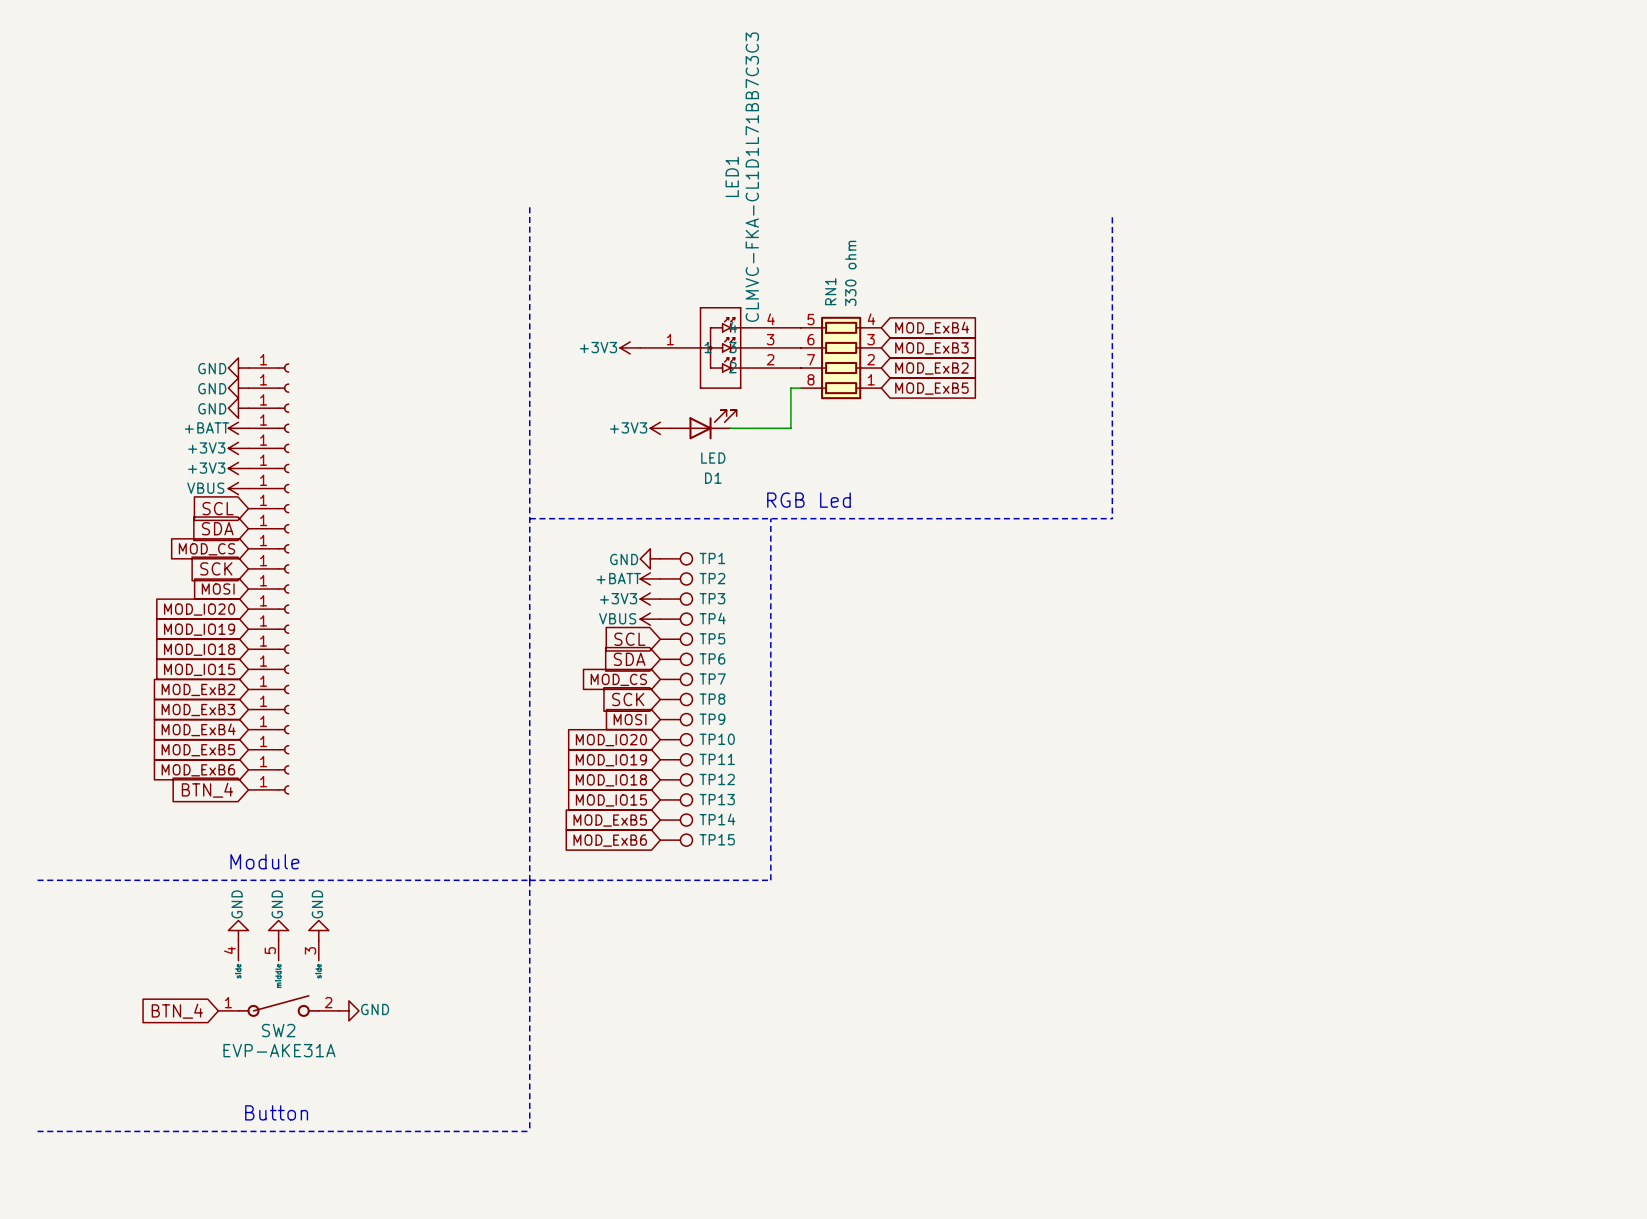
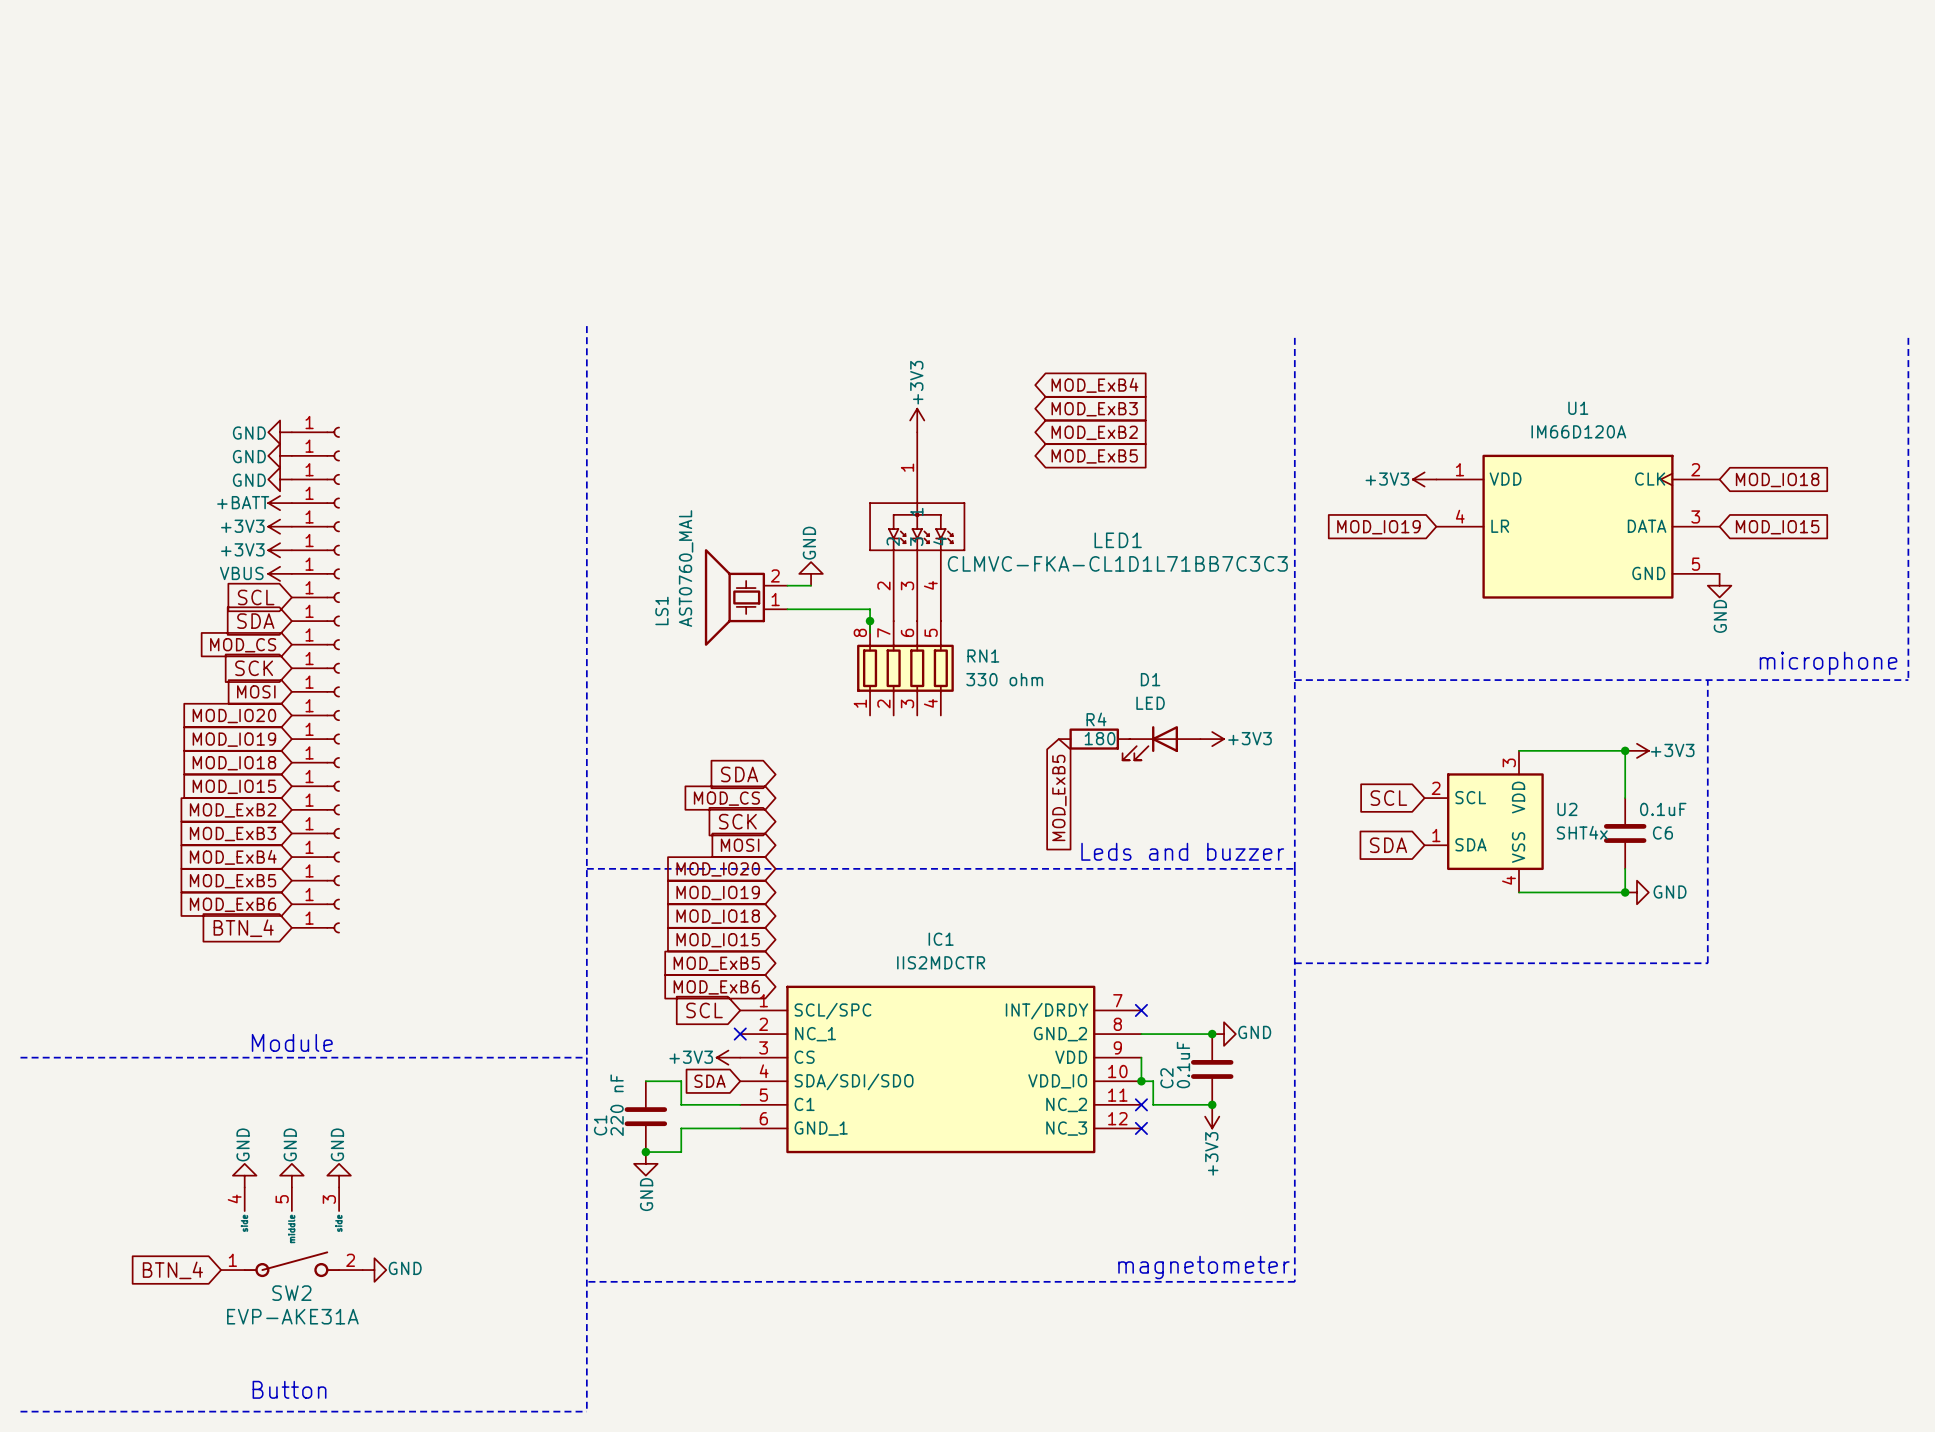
line: (529, 207) (529, 1131) (37, 1131) -> none
line: (1112, 217) (1112, 518) (529, 518) -> none
line: none -> (586, 326) (586, 1411) (20, 1411)
line: none -> (1294, 337) (1294, 1281) (586, 1281)
line: none -> (1908, 337) (1908, 680) (1294, 680)
power symbol: +3V3 (630, 347) -> none
LED1 rotation: 0° (720, 347) -> 90° clockwise (917, 526)
LED1 position: (720, 347) -> (917, 526)
power symbol: none -> +3V3 (917, 420)
RN1 rotation: 0° (841, 357) -> 90° clockwise (905, 668)
RN1 position: (841, 357) -> (905, 668)
wire: (800, 388) (790, 388) (790, 428) (730, 428) -> none
power symbol: none -> +3V3 (1424, 479)
global label: none -> MOD_IO18 (1777, 480)
D1 position: (703, 424) -> (1161, 743)
D1 rotation: 0° (713, 424) -> 180° (1150, 743)
power symbol: +3V3 (660, 428) -> none
global label: none -> MOD_IO19 (1378, 527)
U1: none -> IM66D120A (1578, 526)
global label: none -> MOD_IO15 (1777, 527)
wire: none -> (787, 585) (811, 585)
power symbol: none -> GND (1719, 585)
text: RGB Led (808, 500) -> none
LS1: none -> AST0760_MAL (746, 597)
wire: none -> (787, 609) (870, 609) (870, 632)
line: (770, 518) (770, 880) (37, 880) -> none
junction: none -> (870, 621)
power symbol rotation: 0° (650, 558) -> 90° clockwise (811, 573)
power symbol position: GND (650, 558) -> GND (811, 573)
TP1: (676, 558) -> none
text: none -> microphone (1828, 663)
power symbol: +BATT (650, 578) -> none
TP2: (676, 578) -> none
line: none -> (1707, 680) (1707, 963) (1294, 963)
power symbol: +3V3 (650, 599) -> none
TP3: (676, 599) -> none
power symbol: VBUS (650, 619) -> none
TP4: (676, 619) -> none
R4: none -> 180 (1094, 739)
power symbol: none -> +3V3 (1212, 739)
global label: SCL (629, 639) -> none
TP5: (676, 639) -> none
wire: none -> (1519, 750) (1625, 750) (1625, 798)
junction: none -> (1625, 750)
power symbol: none -> +3V3 (1636, 750)
TP6: (676, 659) -> none
TP7: (676, 679) -> none
global label: none -> MOD_ExB5 (1059, 797)
global label: none -> SCL (1388, 798)
TP8: (676, 699) -> none
U2: none -> SHT4x (1484, 821)
C6: none -> 0.1uF (1625, 833)
TP9: (676, 719) -> none
global label: none -> SDA (1388, 845)
text: none -> Leds and buzzer (1182, 851)
line: none -> (586, 868) (1294, 868)
TP10: (676, 739) -> none
wire: none -> (1625, 868) (1625, 892) (1519, 892)
TP11: (676, 759) -> none
junction: none -> (1625, 892)
power symbol: none -> GND (1636, 892)
TP12: (676, 779) -> none
TP13: (676, 799) -> none
TP14: (676, 820) -> none
TP15: (676, 840) -> none
global label: none -> SCL (704, 1010)
no-connect mark: none -> (1141, 1010)
text position: Module (264, 861) -> Module (292, 1042)
no-connect mark: none -> (740, 1034)
wire: none -> (1141, 1034) (1212, 1034)
junction: none -> (1212, 1034)
power symbol: none -> GND (1224, 1034)
line: none -> (20, 1057) (586, 1057)
power symbol: none -> +3V3 (728, 1057)
wire: none -> (1141, 1057) (1141, 1081) (1153, 1081) (1153, 1104) (1212, 1104)
IC1: none -> IIS2MDCTR (940, 1069)
C2: none -> 0.1uF (1212, 1069)
wire: none -> (645, 1081) (681, 1081) (681, 1104) (740, 1104)
global label: none -> SDA (710, 1081)
junction: none -> (1141, 1081)
power symbol: GND (238, 930) -> none
power symbol: GND (278, 930) -> none
power symbol: GND (318, 930) -> none
no-connect mark: none -> (1141, 1104)
junction: none -> (1212, 1104)
C1: none -> 220 nF (645, 1116)
power symbol: none -> +3V3 (1212, 1116)
wire: none -> (740, 1128) (681, 1128) (681, 1152) (645, 1152)
no-connect mark: none -> (1141, 1128)
SW2 position: (278, 978) -> (291, 1232)
junction: none -> (645, 1152)
power symbol: none -> GND (645, 1163)
power symbol: none -> GND (244, 1175)
power symbol: none -> GND (291, 1175)
power symbol: none -> GND (339, 1175)
power symbol: GND (348, 1010) -> none
global label position: BTN_4 (177, 1011) -> BTN_4 (172, 1270)
text: none -> magnetometer (1203, 1267)
power symbol: none -> GND (374, 1270)
text position: Button (276, 1112) -> Button (289, 1389)

